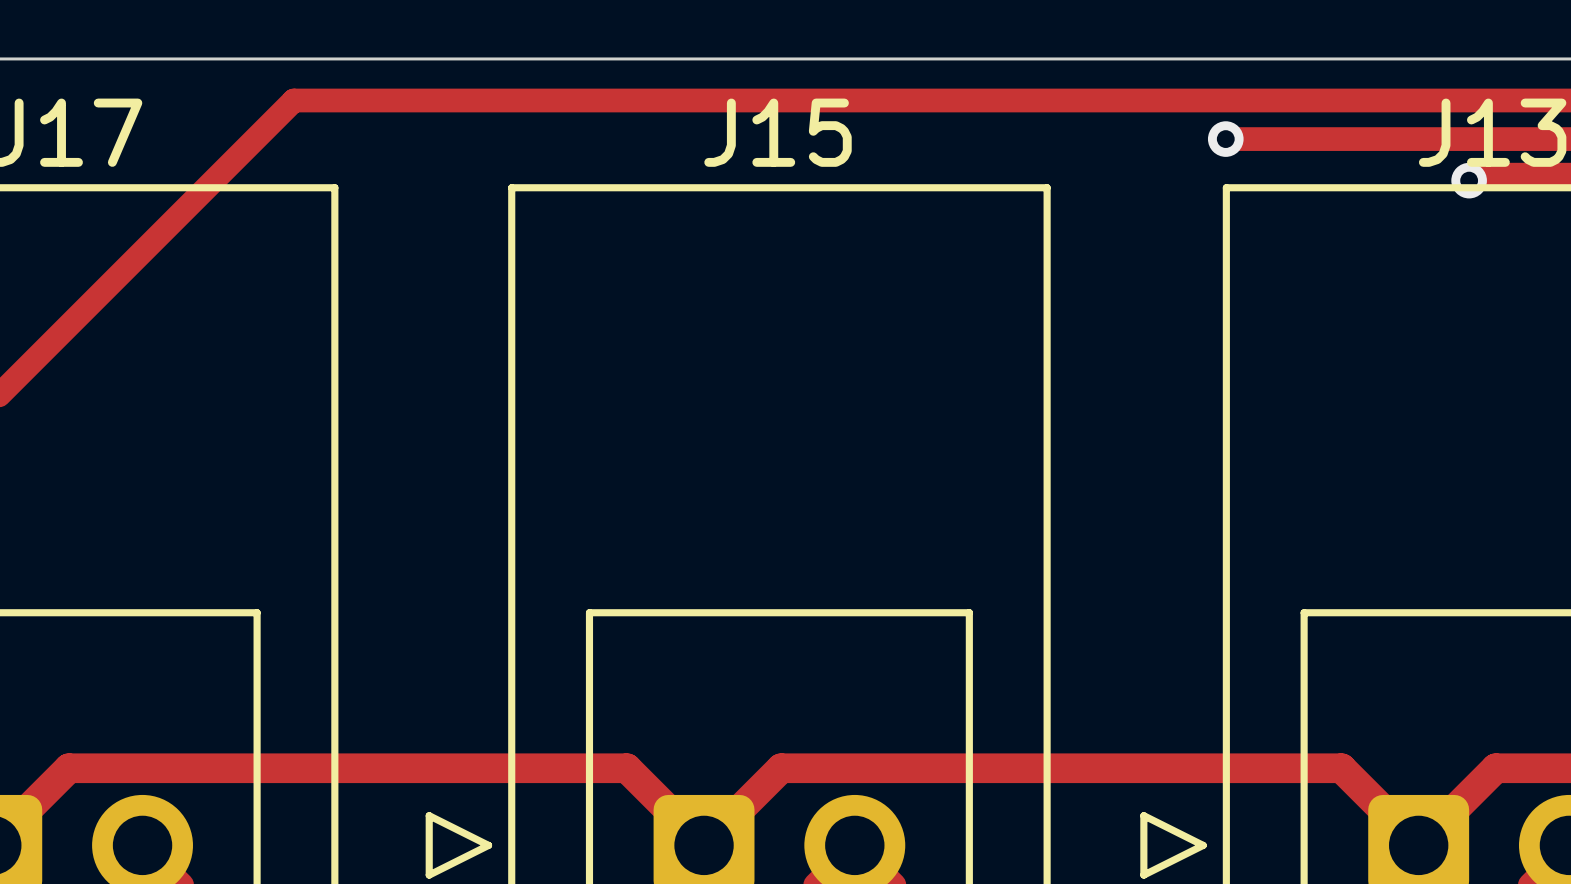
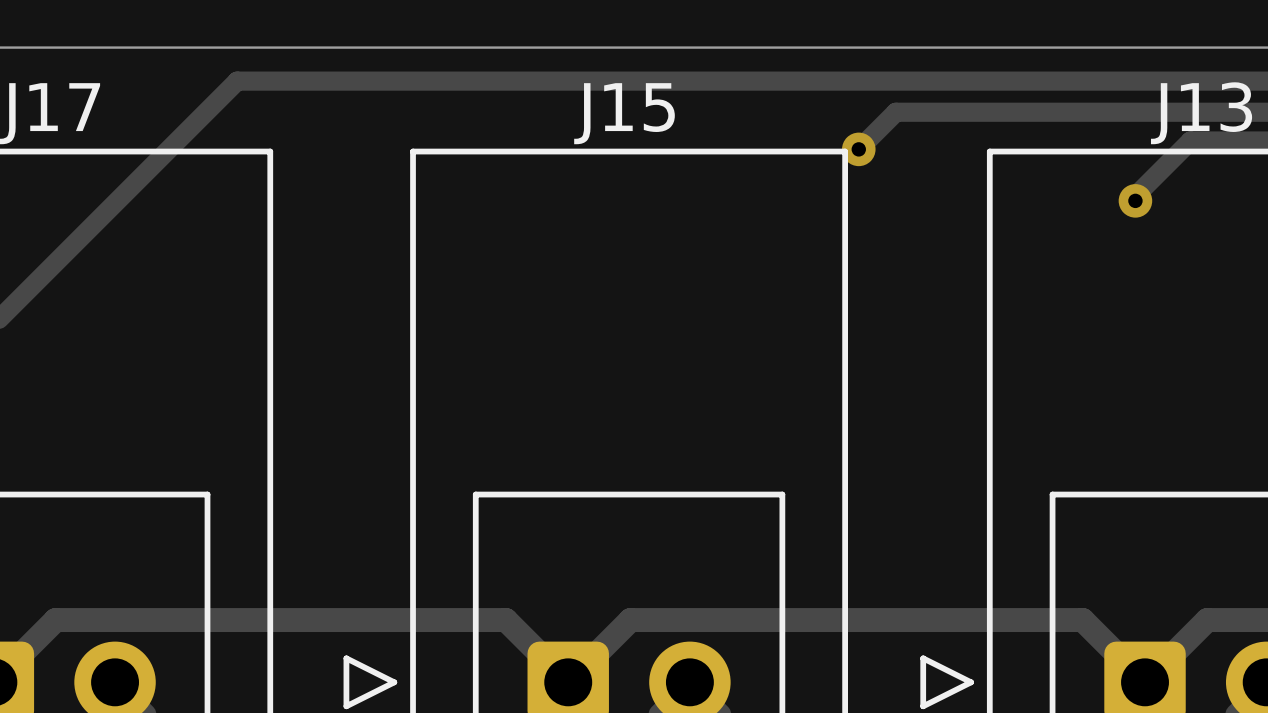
track: none -> (989, 112) (895, 112) (858, 149)
via: (1225, 139) -> none
track: none -> (1185, 145) (1135, 196) (1135, 200)
via: (1469, 180) -> none
via: none -> (858, 149)
via: none -> (1135, 200)

